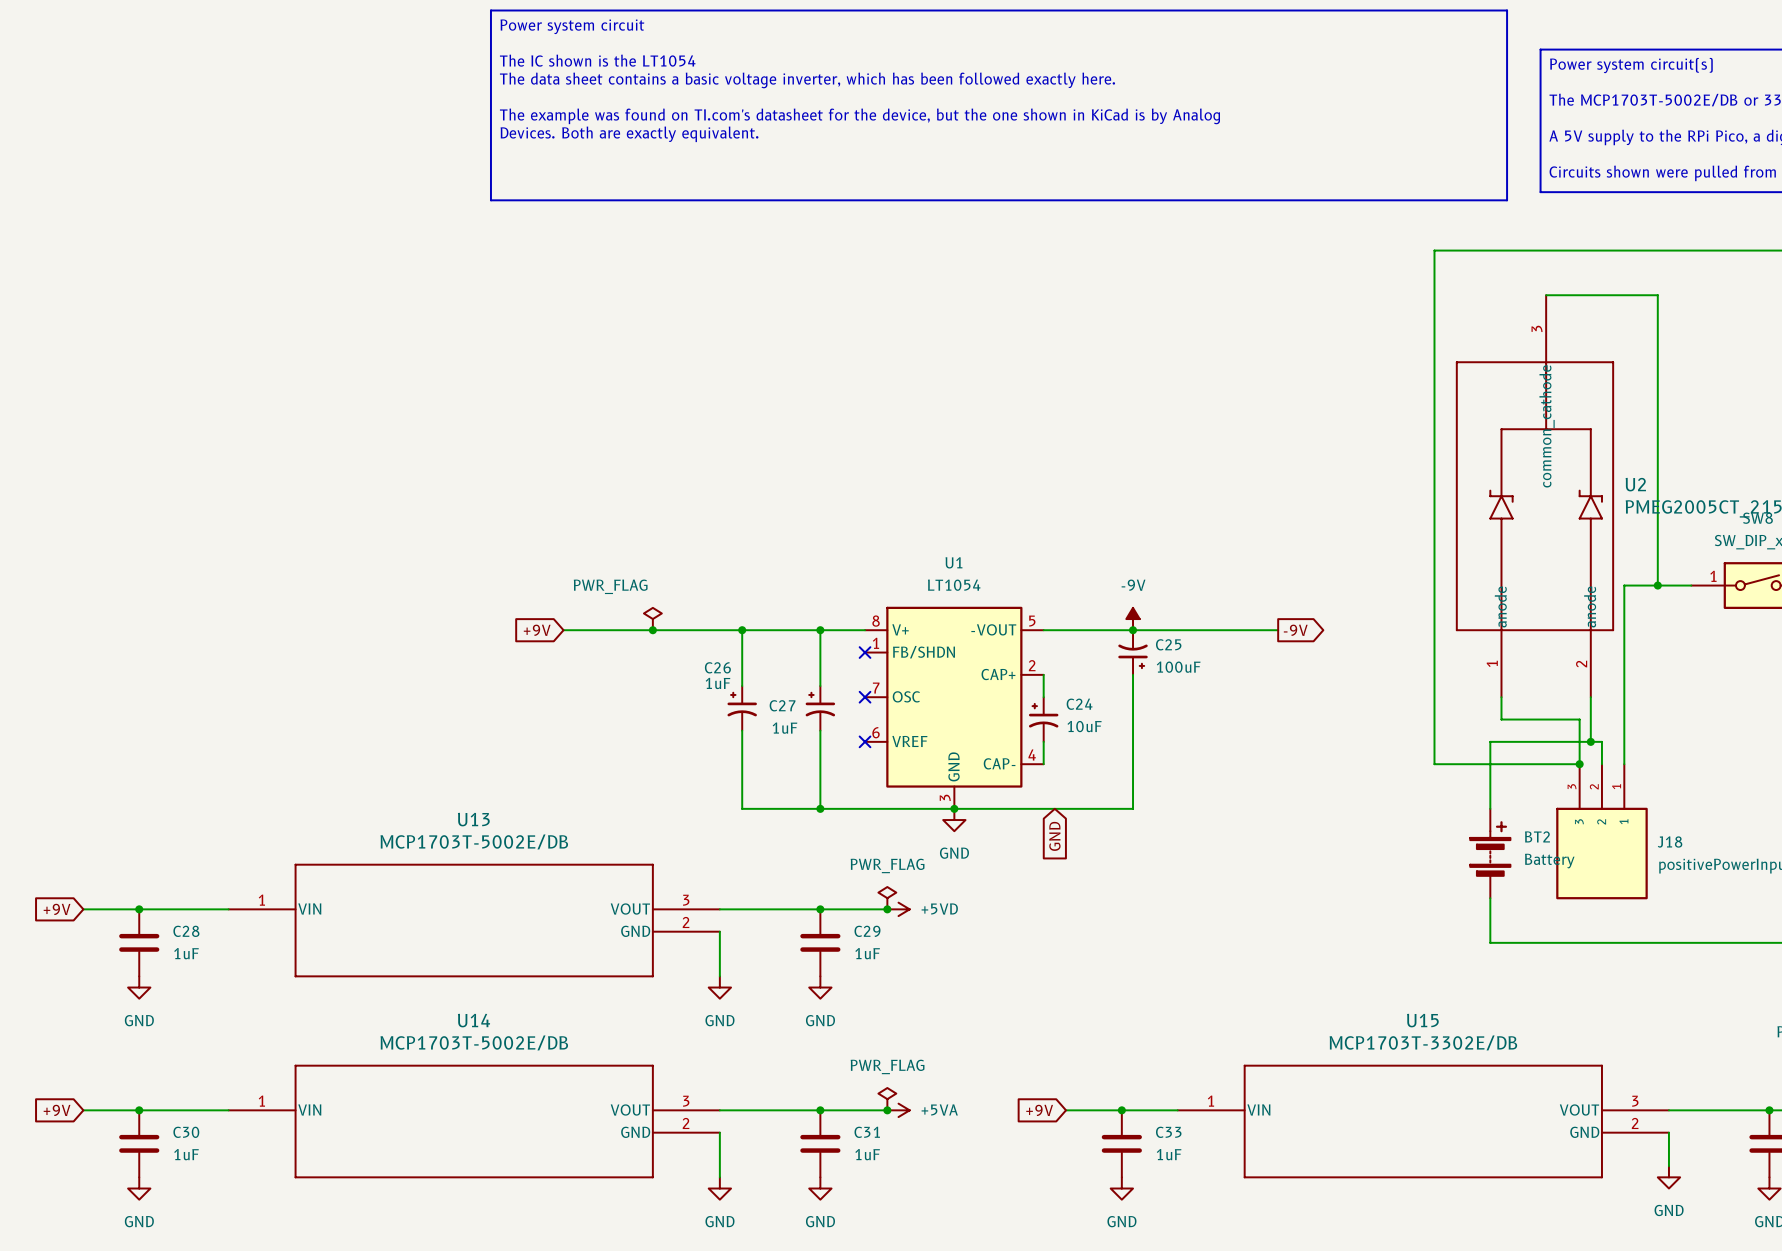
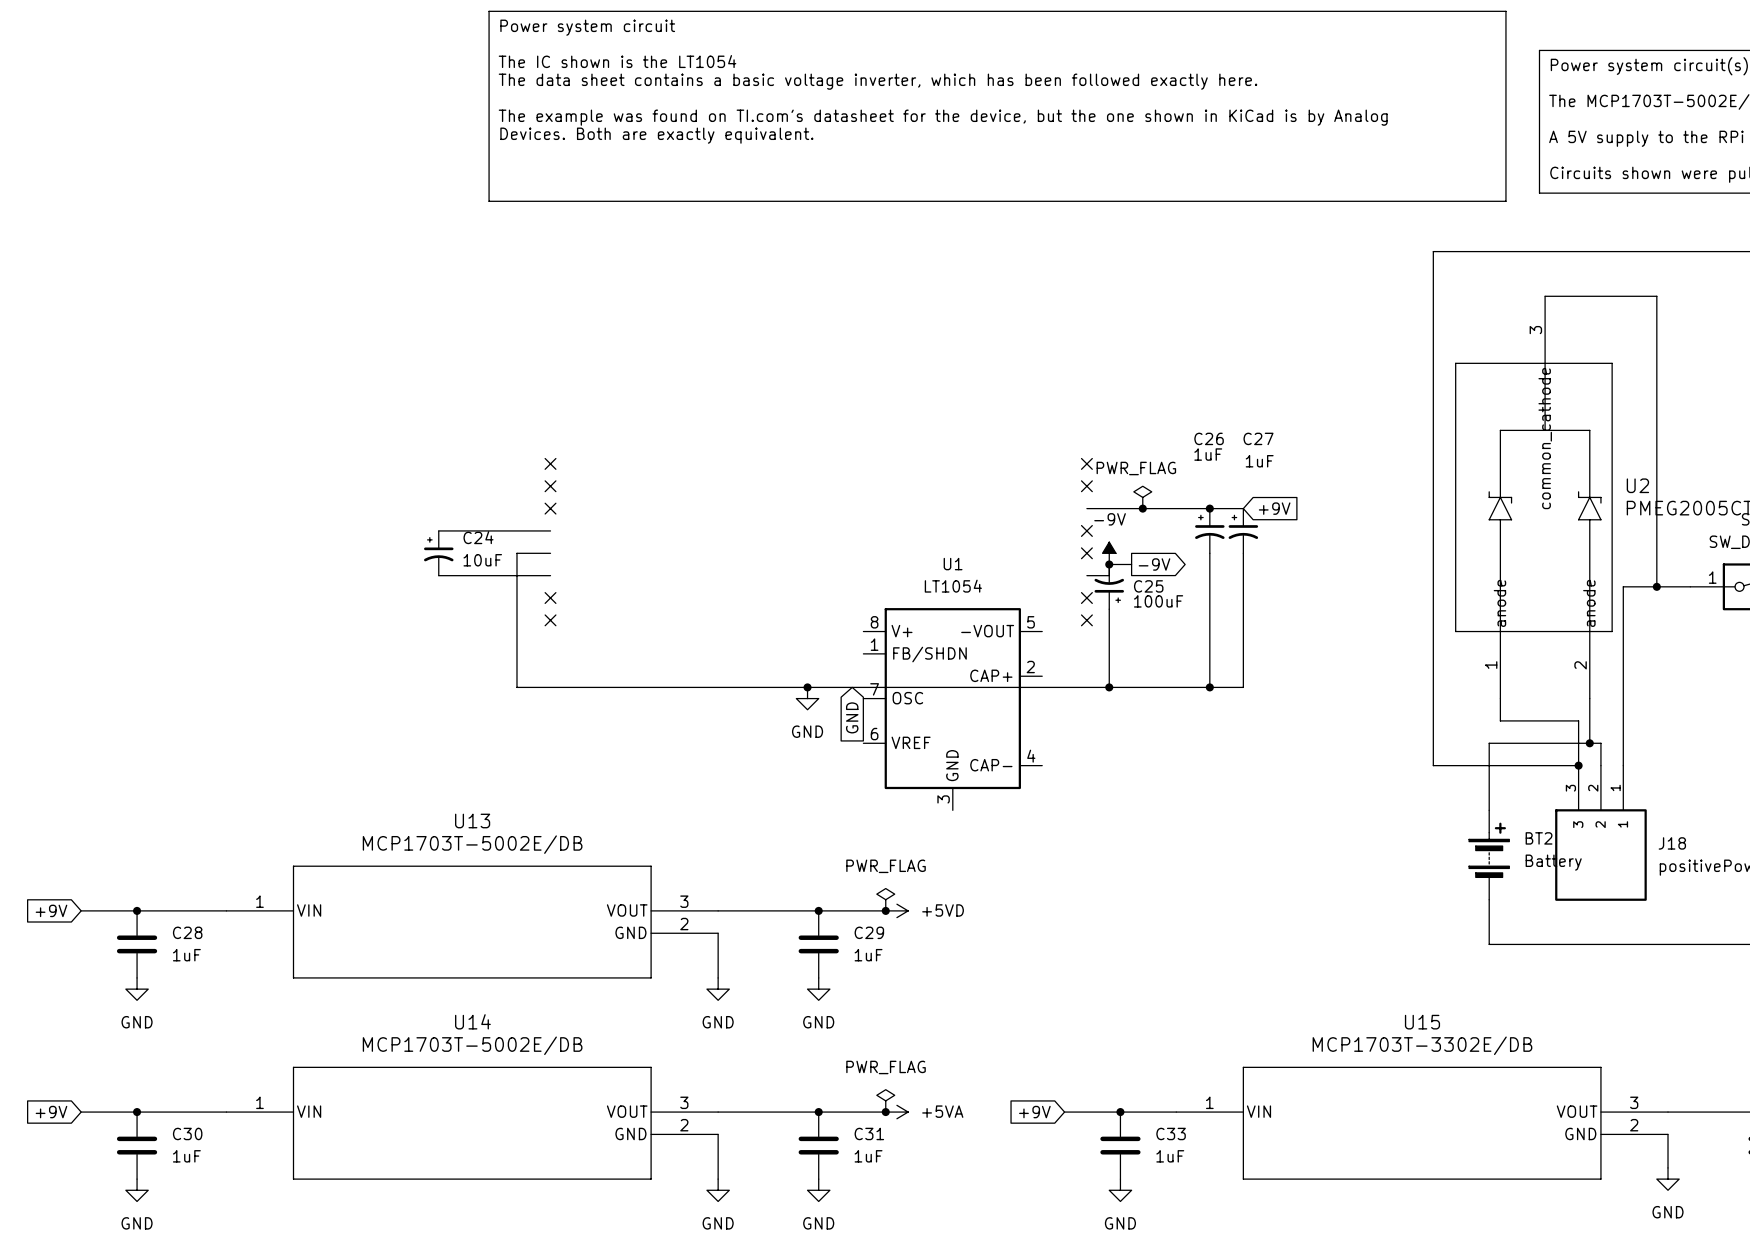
no-connect mark: none -> (550, 463)
no-connect mark: none -> (1086, 463)
no-connect mark: none -> (550, 486)
no-connect mark: none -> (1086, 486)
power symbol: none -> PWR_FLAG (1142, 497)
no-connect mark: none -> (550, 508)
wire: none -> (1086, 508) (1243, 508)
junction: none -> (1142, 508)
junction: none -> (1209, 508)
global label: none -> +9V (1274, 508)
wire: none -> (438, 530) (550, 530)
no-connect mark: none -> (1086, 530)
wire: none -> (550, 553) (516, 553) (516, 687) (1243, 687) (1243, 553)
no-connect mark: none -> (1086, 553)
wire: none -> (1209, 553) (1209, 687)
junction: none -> (1109, 564)
wire: none -> (1131, 564) (1109, 564) (1109, 575) (1086, 575)
wire: none -> (438, 575) (550, 575)
no-connect mark: none -> (550, 598)
no-connect mark: none -> (1086, 598)
wire: none -> (1109, 609) (1109, 687)
no-connect mark: none -> (550, 620)
power symbol: PWR_FLAG (652, 619) -> none
no-connect mark: none -> (1086, 620)
power symbol position: -9V (1133, 619) -> -9V (1109, 553)
global label: +9V (537, 630) -> none
wire: (563, 630) (865, 630) -> none
junction: (652, 630) -> none
wire: (742, 630) (742, 686) -> none
junction: (742, 630) -> none
wire: (820, 630) (820, 686) -> none
junction: (820, 630) -> none
wire: (1043, 630) (1278, 630) -> none
junction: (1133, 630) -> none
global label position: -9V (1295, 630) -> -9V (1154, 564)
C25 name position: C25 (1168, 644) -> C25 (1148, 586)
no-connect mark: (865, 652) -> none
C25 position: (1133, 652) -> (1109, 586)
C26 name position: C26 (717, 667) -> C26 (1209, 438)
wire: (1043, 674) (1043, 697) -> none
wire: (1133, 674) (1133, 808) (742, 808) (742, 730) -> none
C26 value position: 1uF (717, 683) -> 1uF (1208, 454)
junction: none -> (807, 687)
junction: none -> (1109, 687)
junction: none -> (1209, 687)
no-connect mark: (865, 697) -> none
C27 name position: C27 (782, 705) -> C27 (1258, 438)
C26 position: (742, 708) -> (1209, 530)
C27 position: (820, 708) -> (1243, 530)
global label: none -> GND (852, 717)
C24 position: (1043, 719) -> (438, 553)
C27 value position: 1uF (784, 728) -> 1uF (1259, 461)
wire: (820, 730) (820, 808) -> none
no-connect mark: (865, 741) -> none
wire: (1043, 741) (1043, 764) -> none
junction: (820, 808) -> none
junction: (954, 808) -> none
power symbol position: GND (954, 820) -> GND (807, 698)
global label: GND (1054, 836) -> none

